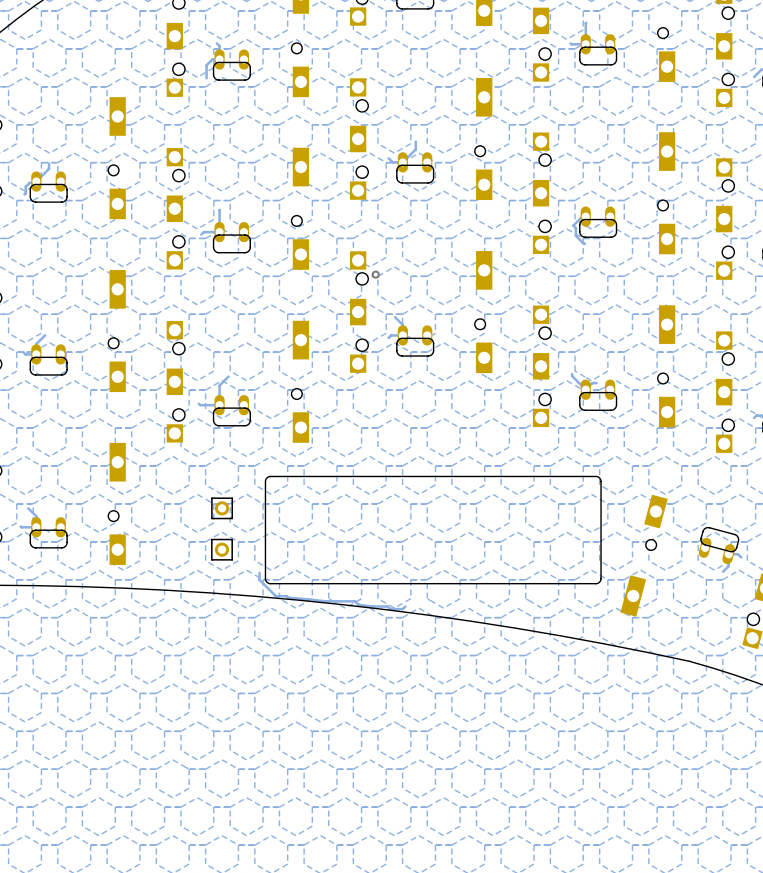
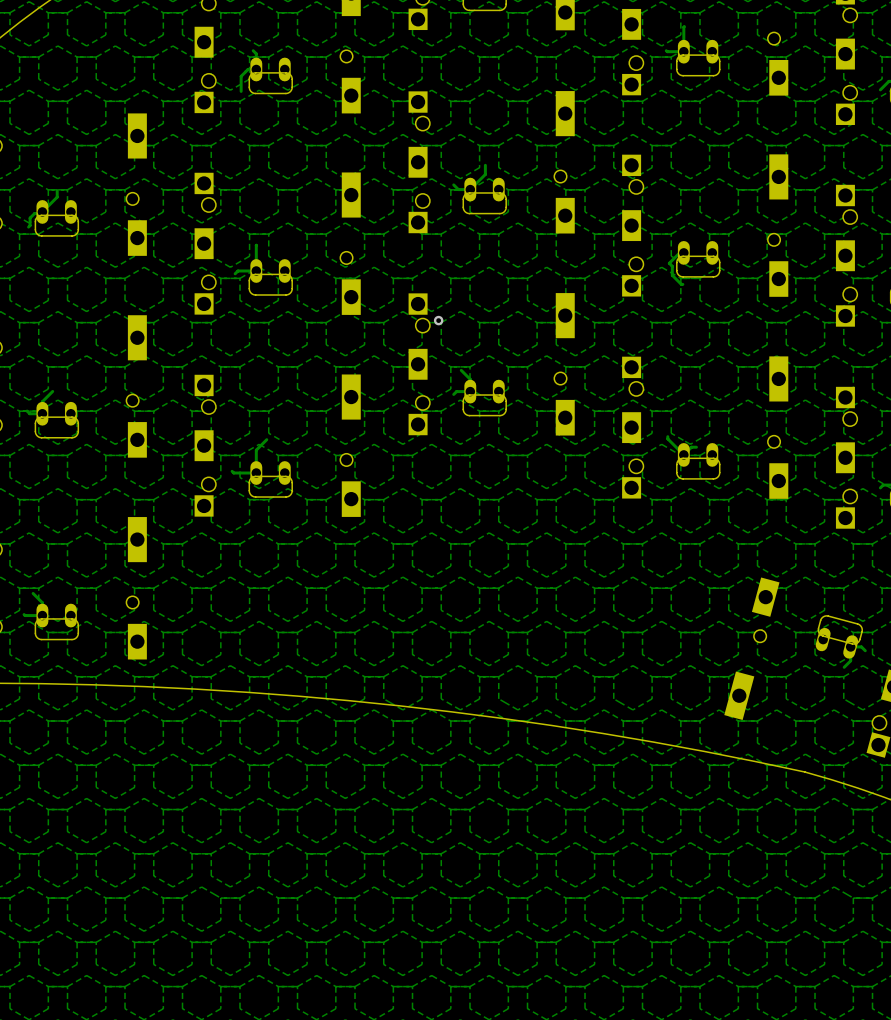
board edge: (595, 476) (269, 476) (265, 481) (265, 580) (270, 583) (597, 583) (601, 578) (601, 481) (595, 476) -> none
part: (222, 508) -> none
part: (222, 549) -> none
track: (259, 572) (259, 579) (275, 596) (325, 601) (355, 601) (358, 604) (387, 606) (393, 609) (402, 609) (405, 606) -> none

